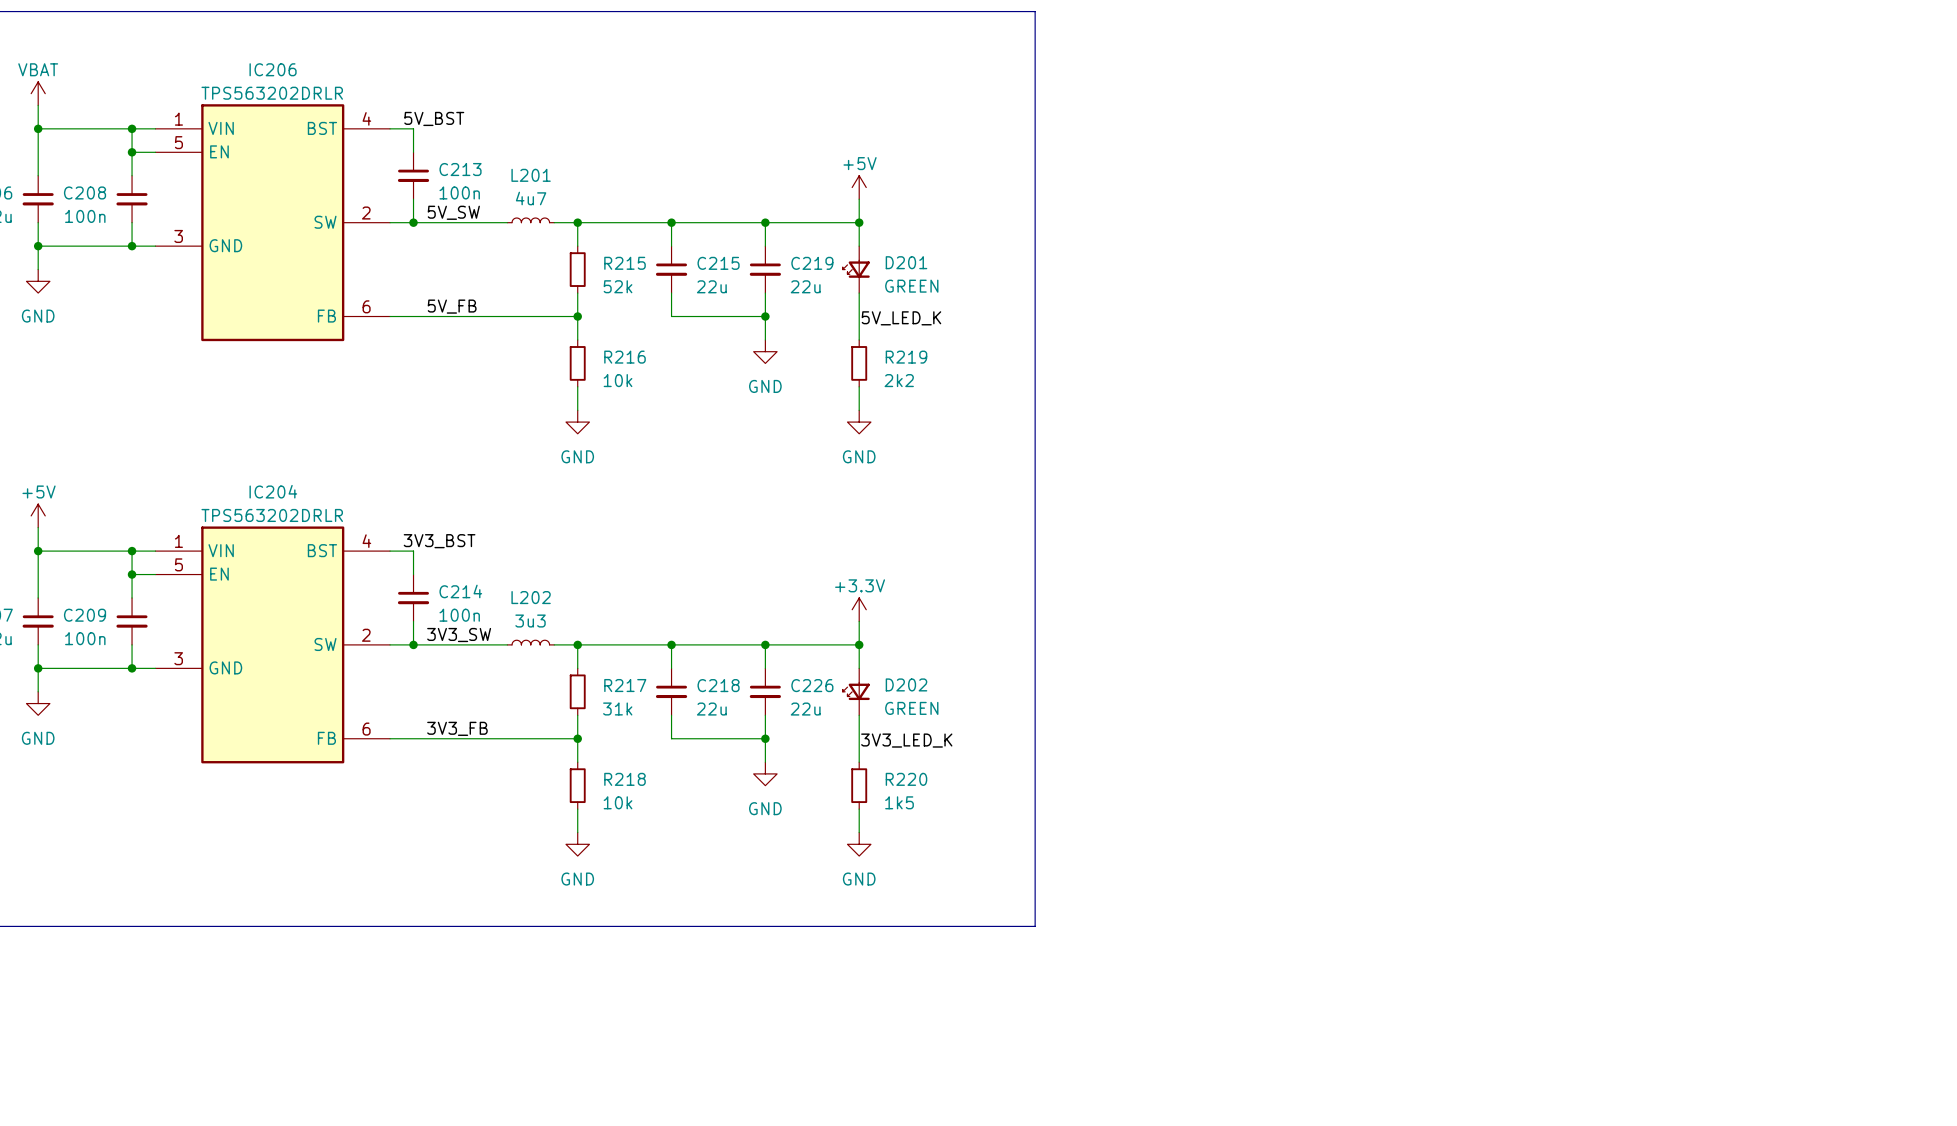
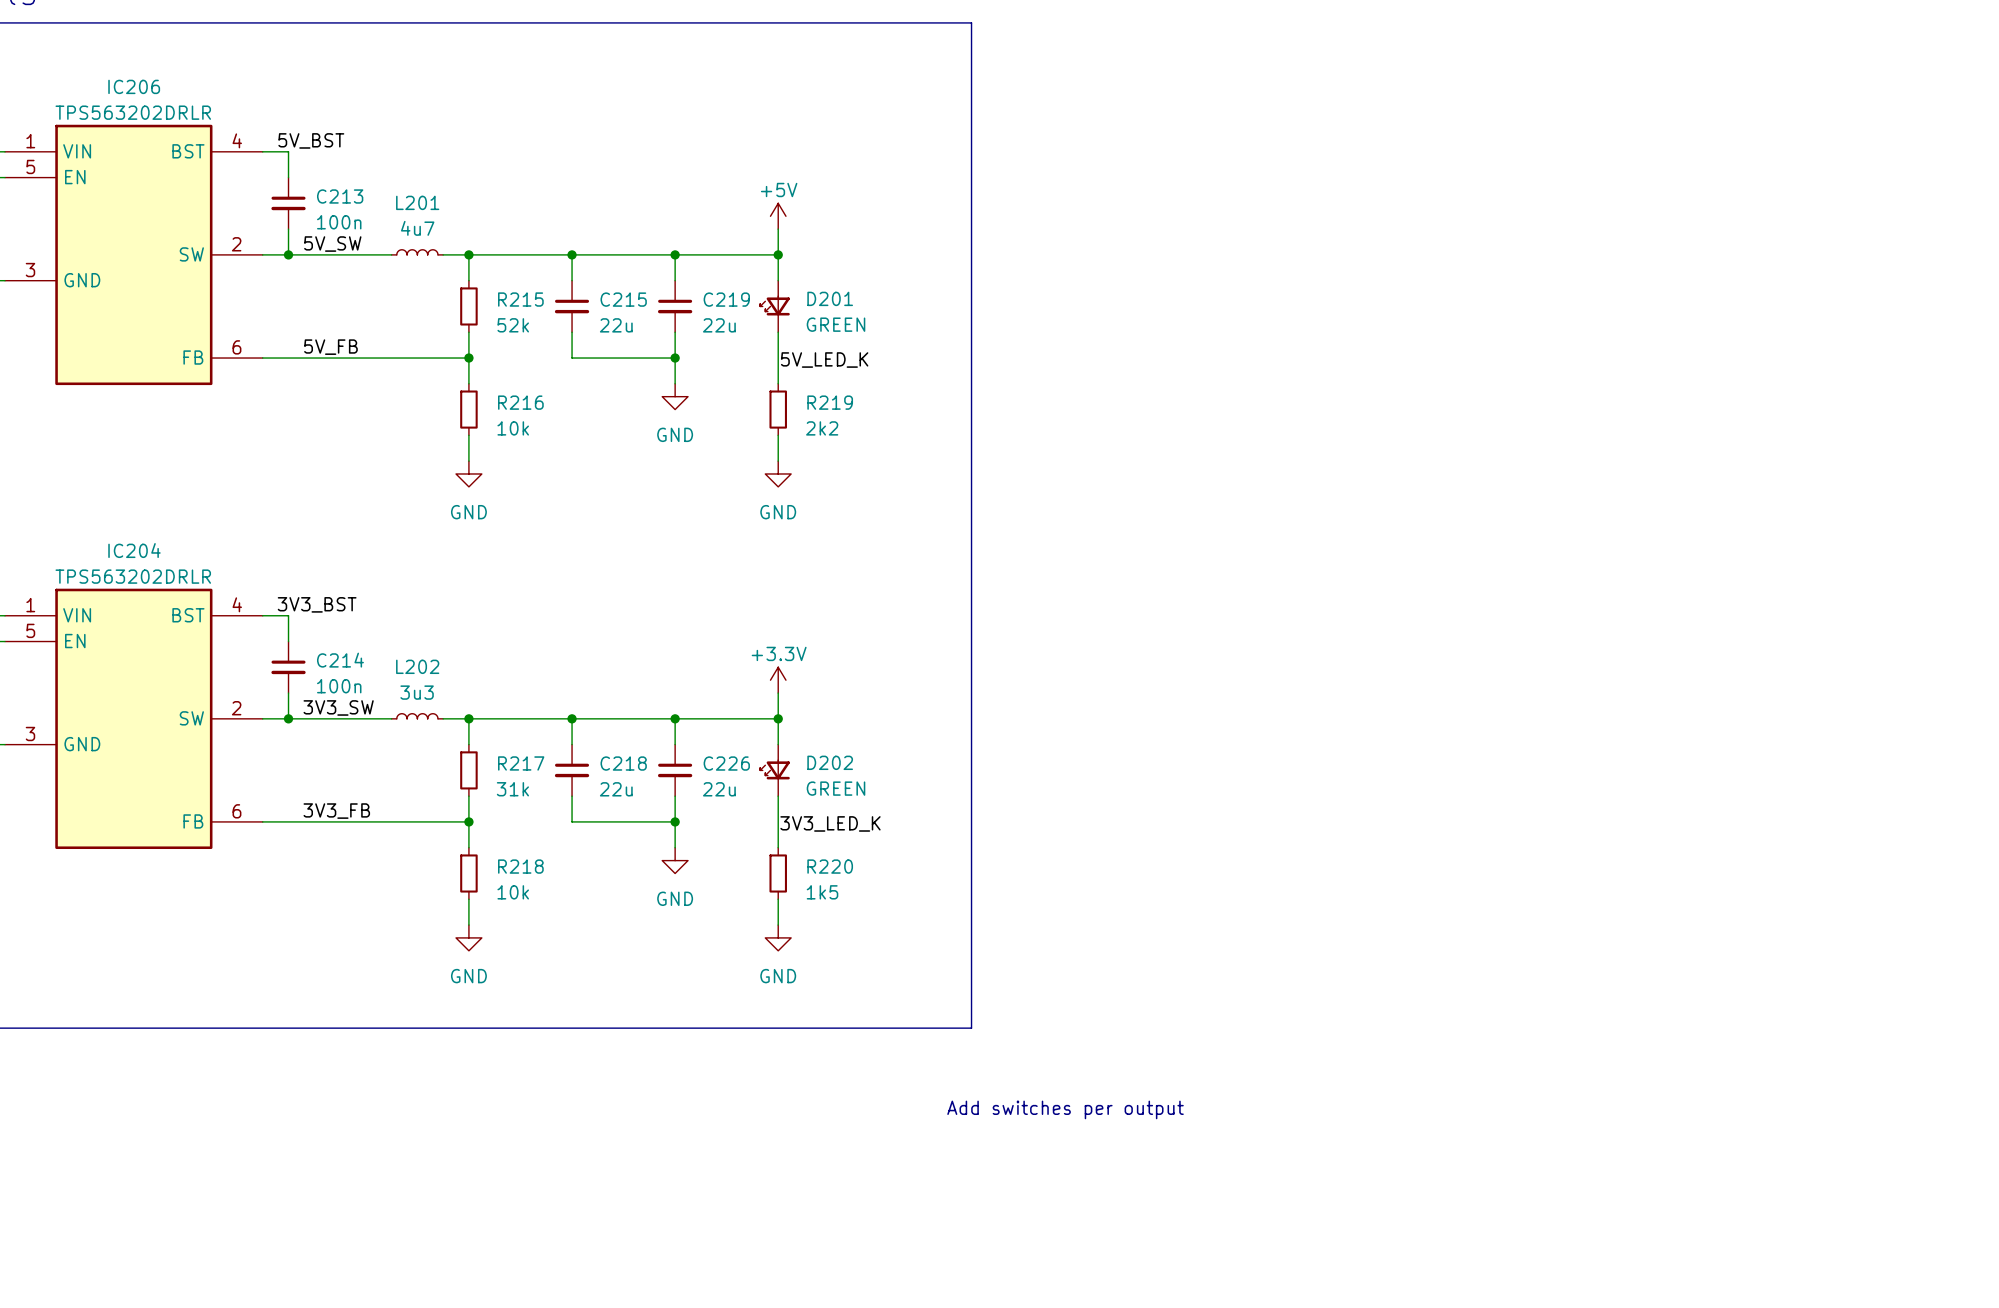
text: none -> Add switches per output (1065, 1109)

